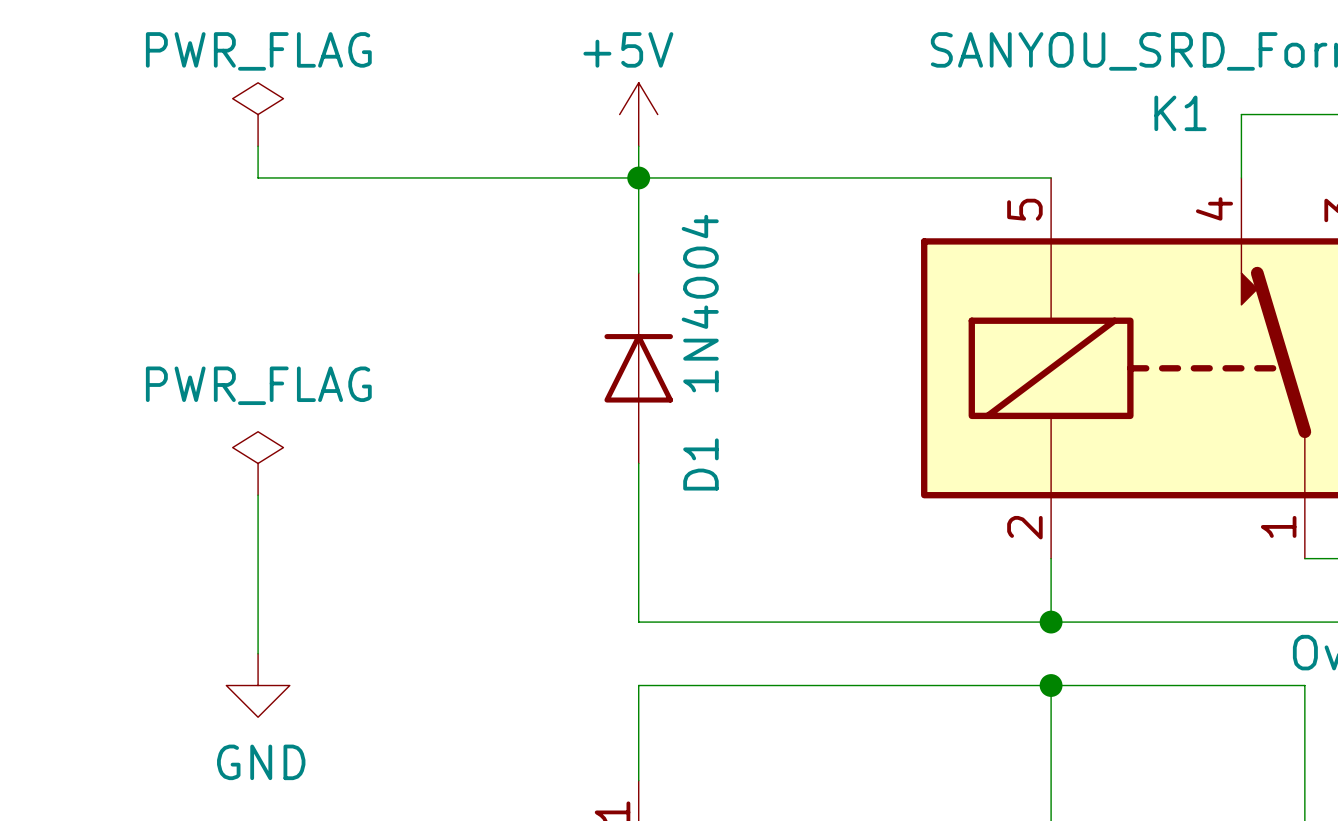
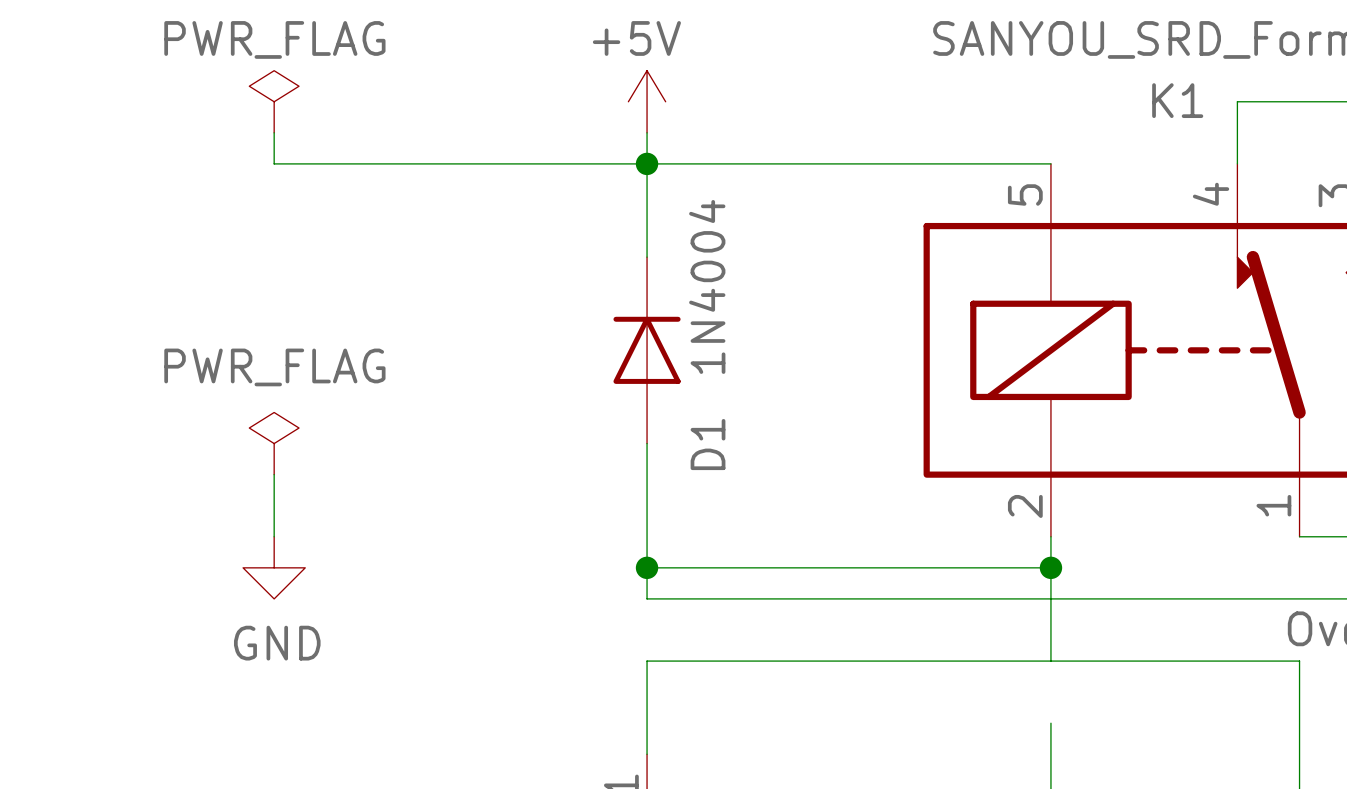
wire: (258, 558) (258, 653) -> none
wire: none -> (647, 567) (1050, 567)
junction: none -> (647, 567)
junction position: (1051, 622) -> (1050, 567)
power symbol position: GND (258, 685) -> GND (274, 567)
wire: (1051, 685) (1051, 748) -> (1050, 661) (1050, 598)
junction: (1051, 685) -> none

